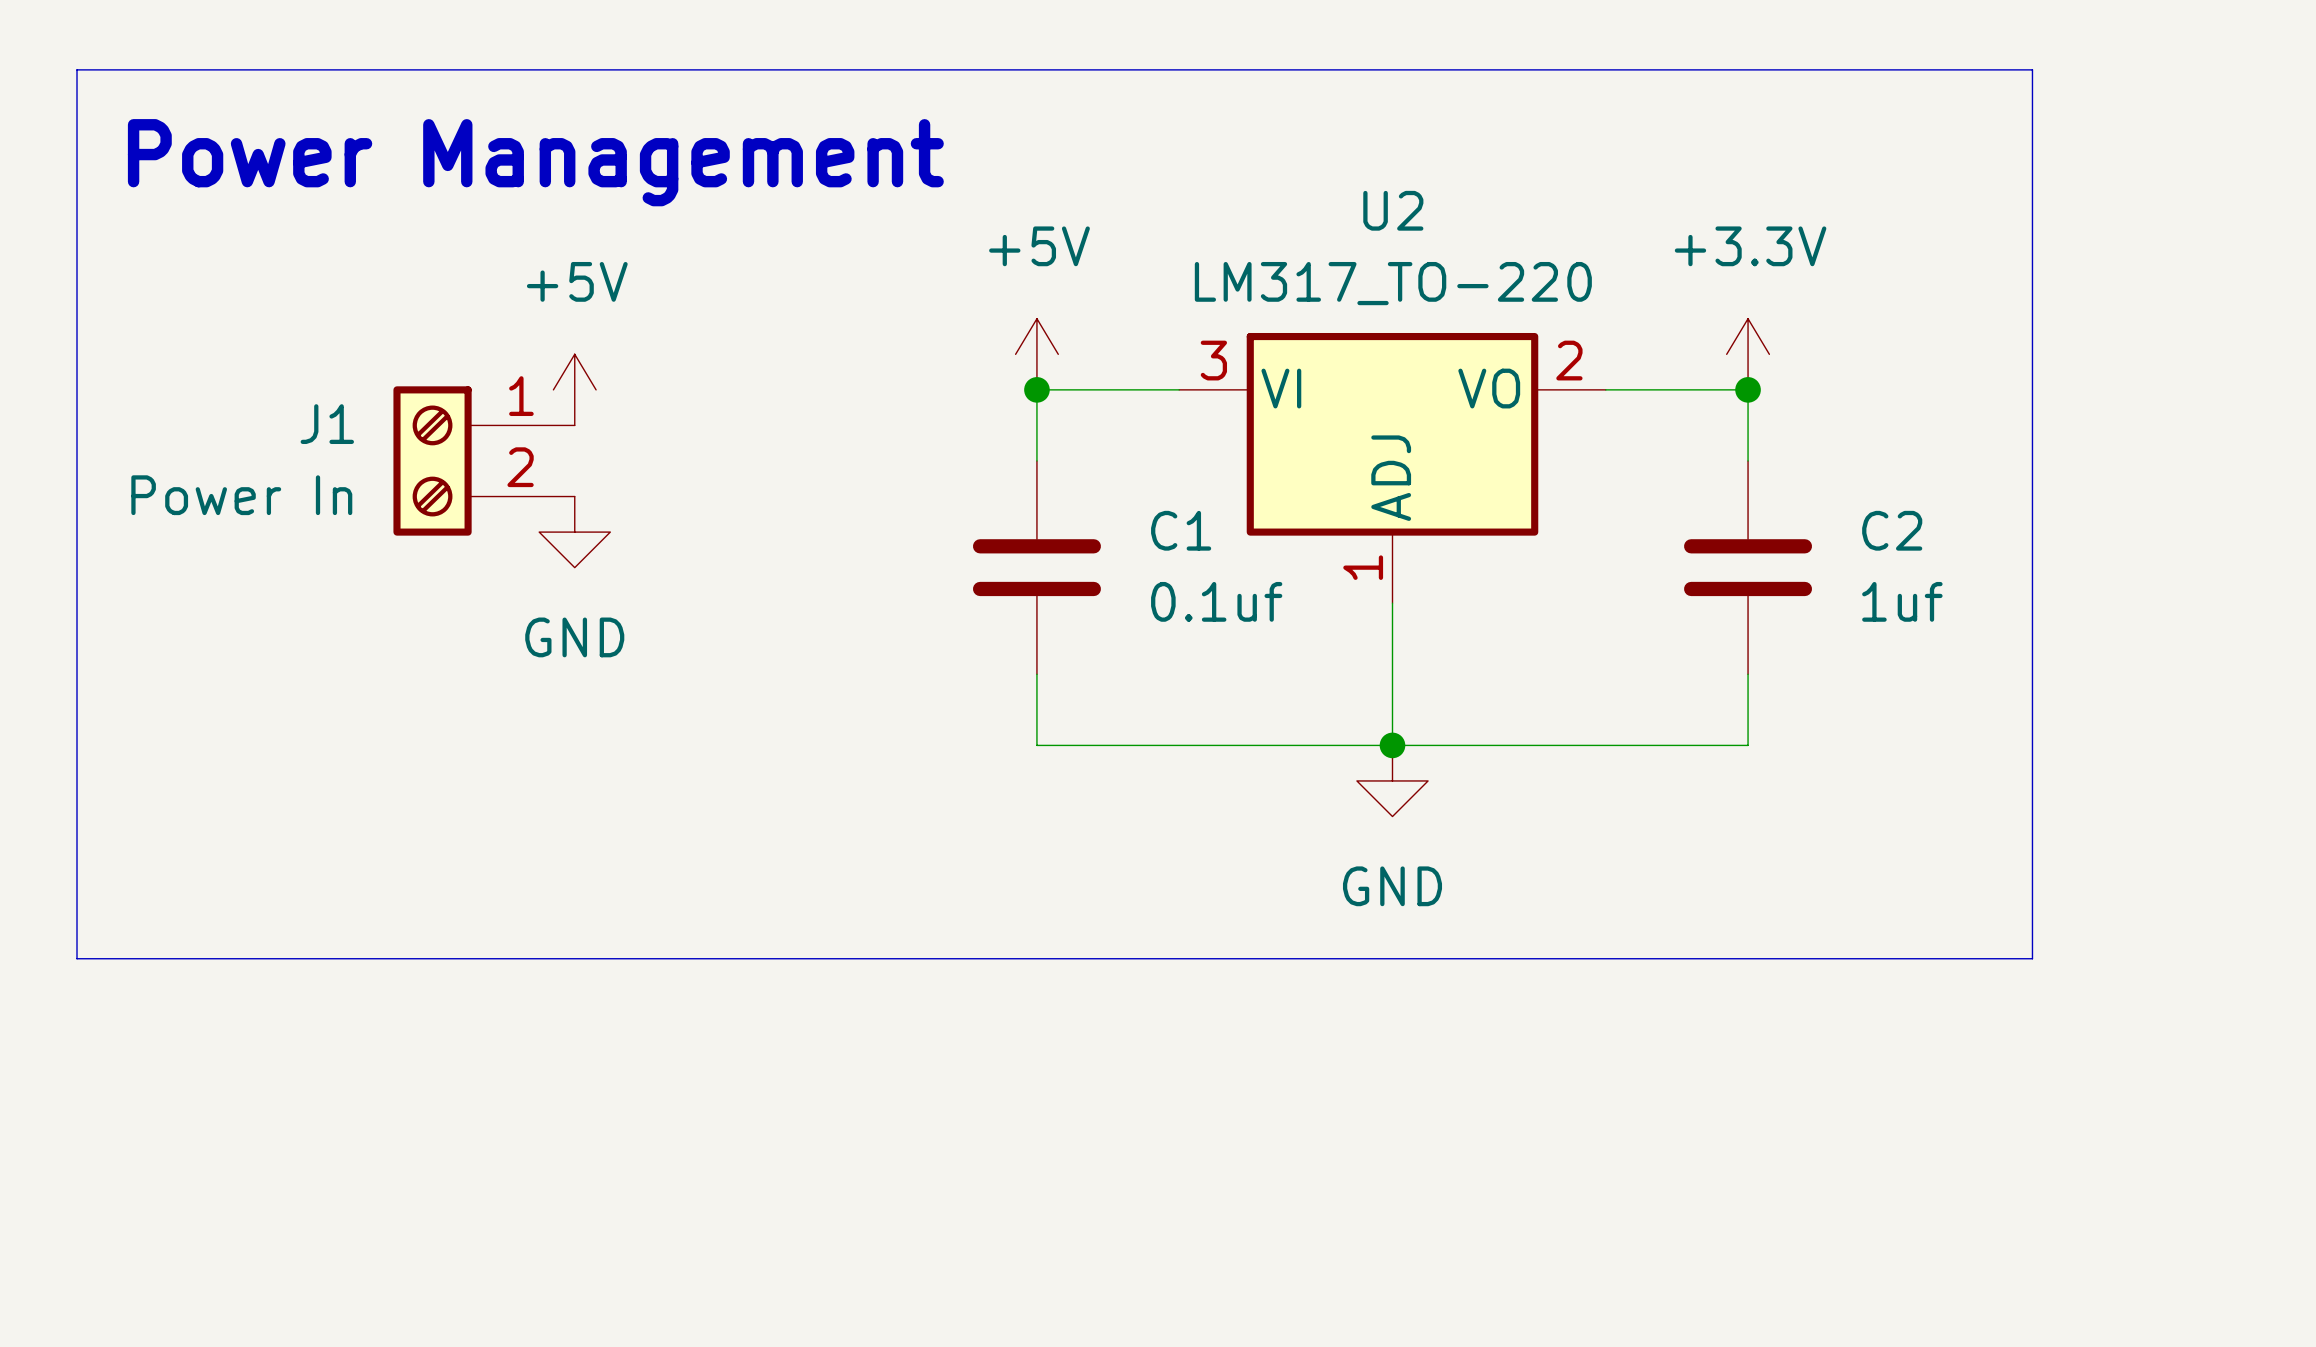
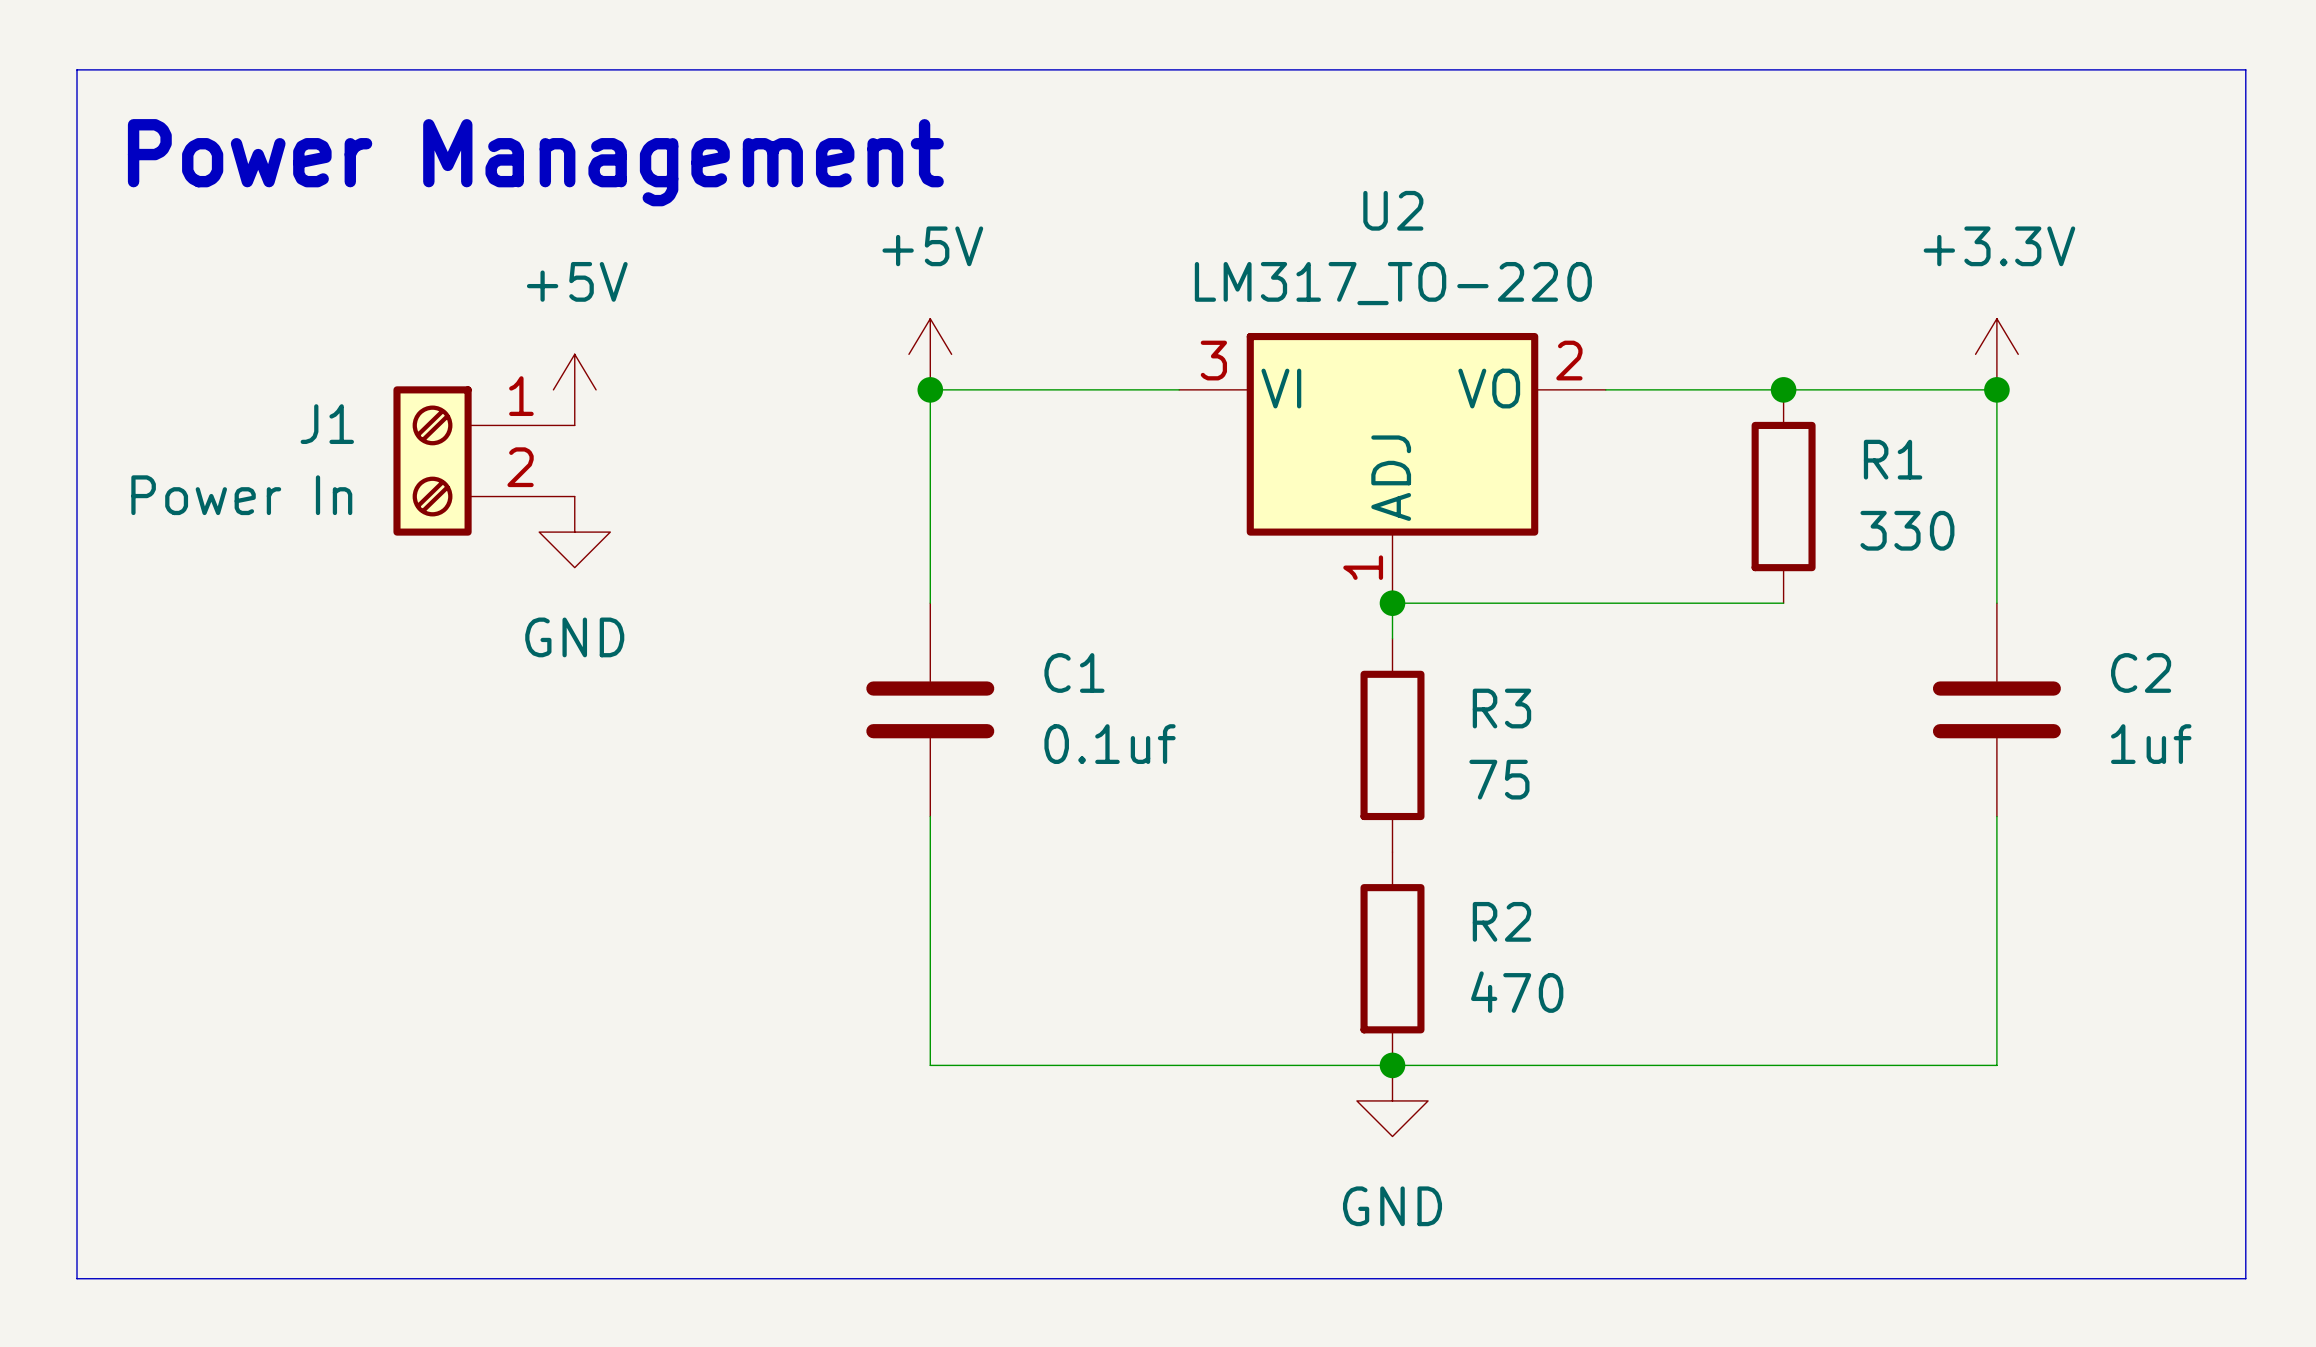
line: (2032, 69) (2032, 958) (77, 958) -> (2032, 69) (2245, 69) (2245, 1278) (77, 1278) (77, 958)
power symbol position: +5V (1036, 354) -> +5V (930, 354)
power symbol position: +3.3V (1748, 354) -> +3.3V (1996, 354)
wire: (1036, 389) (1036, 460) -> (1036, 389) (930, 389) (930, 603)
junction position: (1036, 389) -> (930, 389)
wire: (1748, 389) (1748, 460) -> (1748, 389) (1996, 389) (1996, 603)
junction position: (1748, 389) -> (1783, 389)
junction: none -> (1996, 389)
R1: none -> 330 (1783, 496)
C1 position: (1036, 567) -> (930, 709)
C2 position: (1748, 567) -> (1996, 709)
wire: none -> (1392, 603) (1783, 603)
wire: (1392, 638) (1392, 745) -> none
wire: (1036, 674) (1036, 745) (1748, 745) (1748, 674) -> none
junction position: (1392, 745) -> (1392, 603)
R3: none -> 75 (1392, 745)
power symbol position: GND (1392, 780) -> GND (1392, 1100)
wire: none -> (930, 816) (930, 1065) (1996, 1065) (1996, 816)
R2: none -> 470 (1392, 958)
junction: none -> (1392, 1065)

